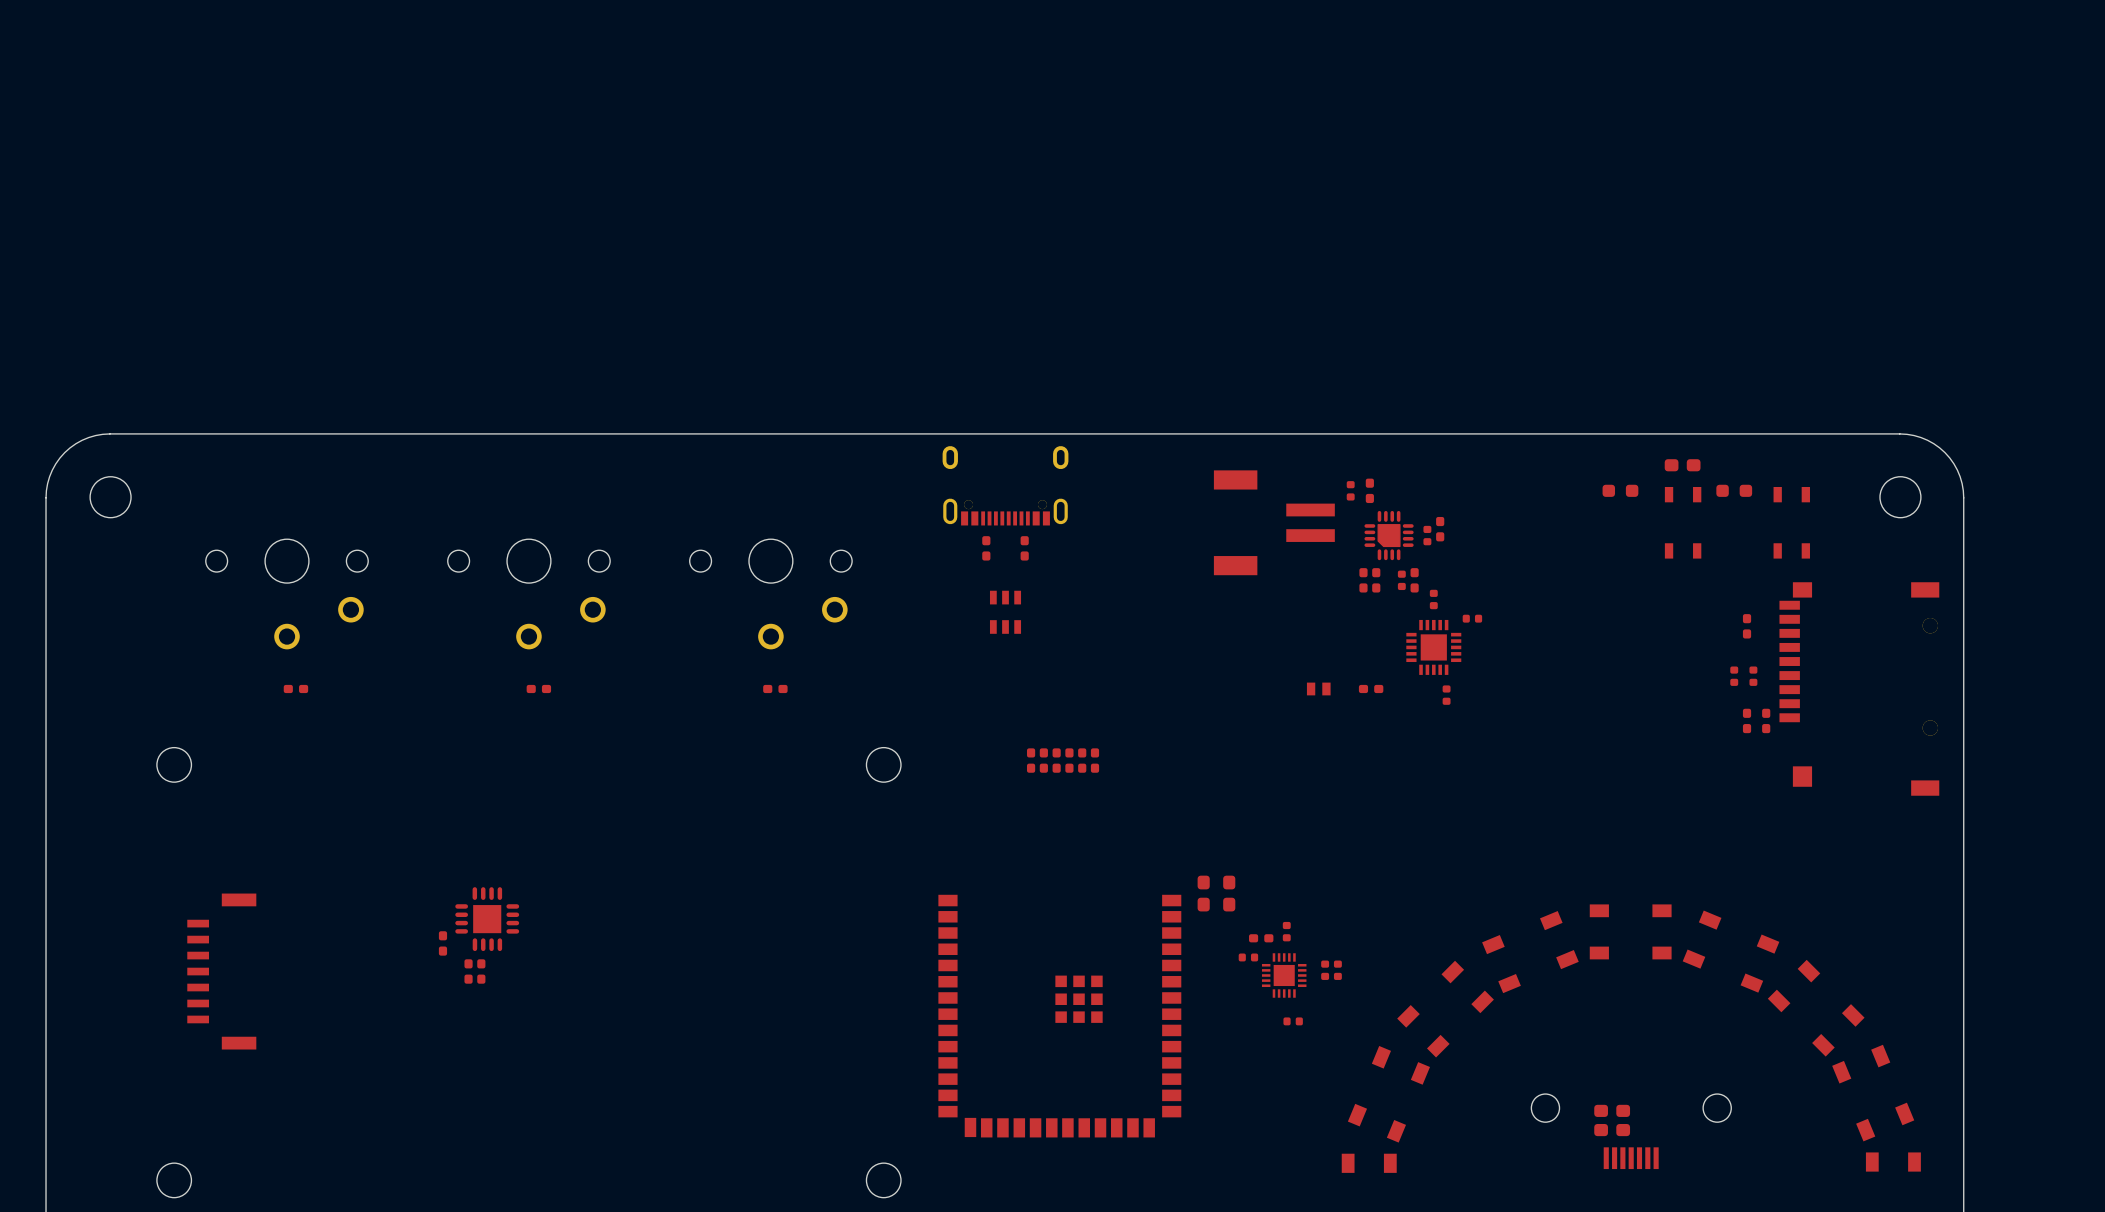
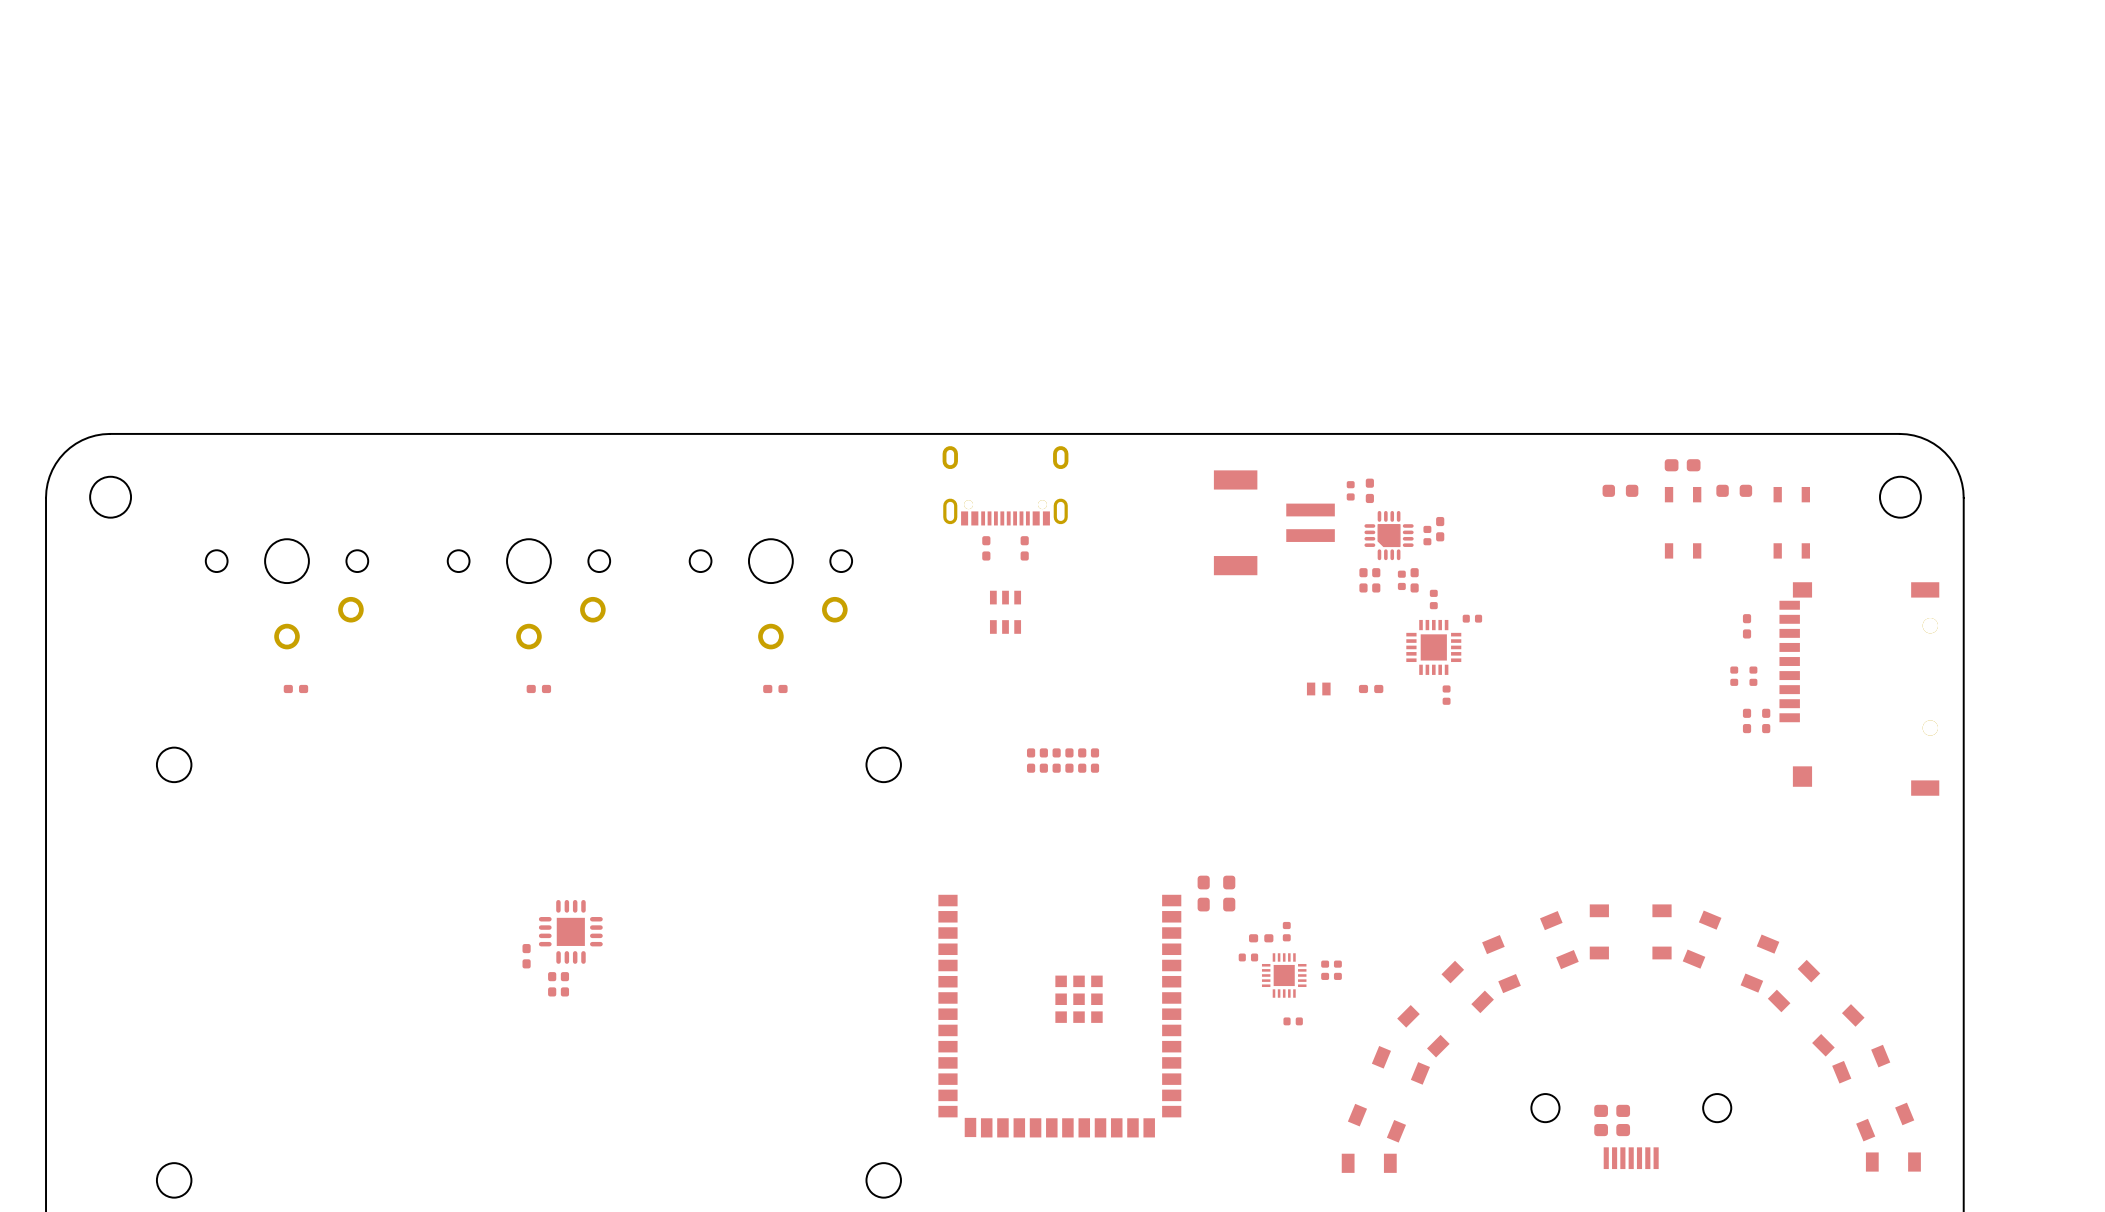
part position: (487, 919) -> (570, 931)
part: (442, 943) -> none
part: none -> (526, 956)
part: (221, 971) -> none
part: (468, 971) -> none
part: (481, 971) -> none
part: none -> (552, 984)
part: none -> (564, 984)

